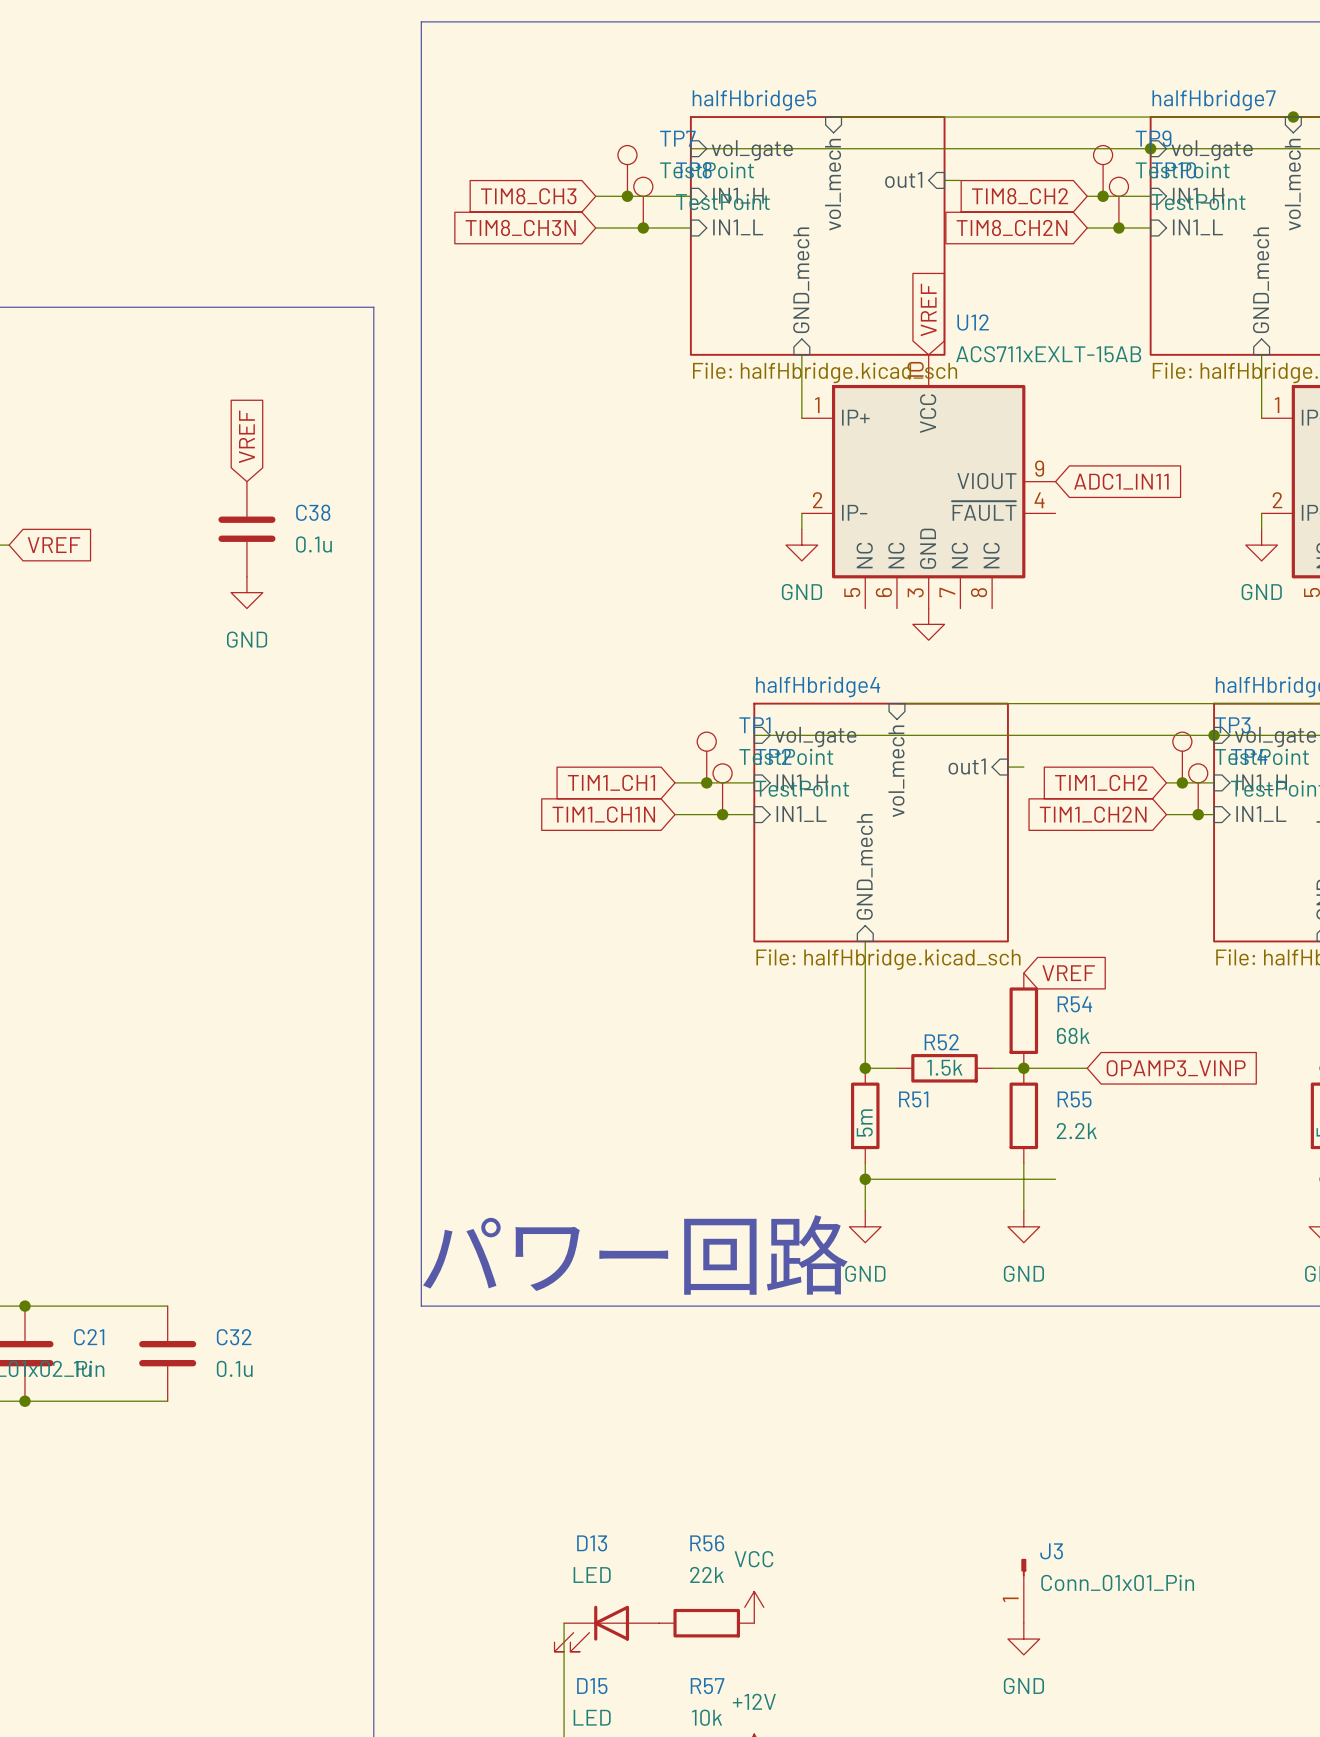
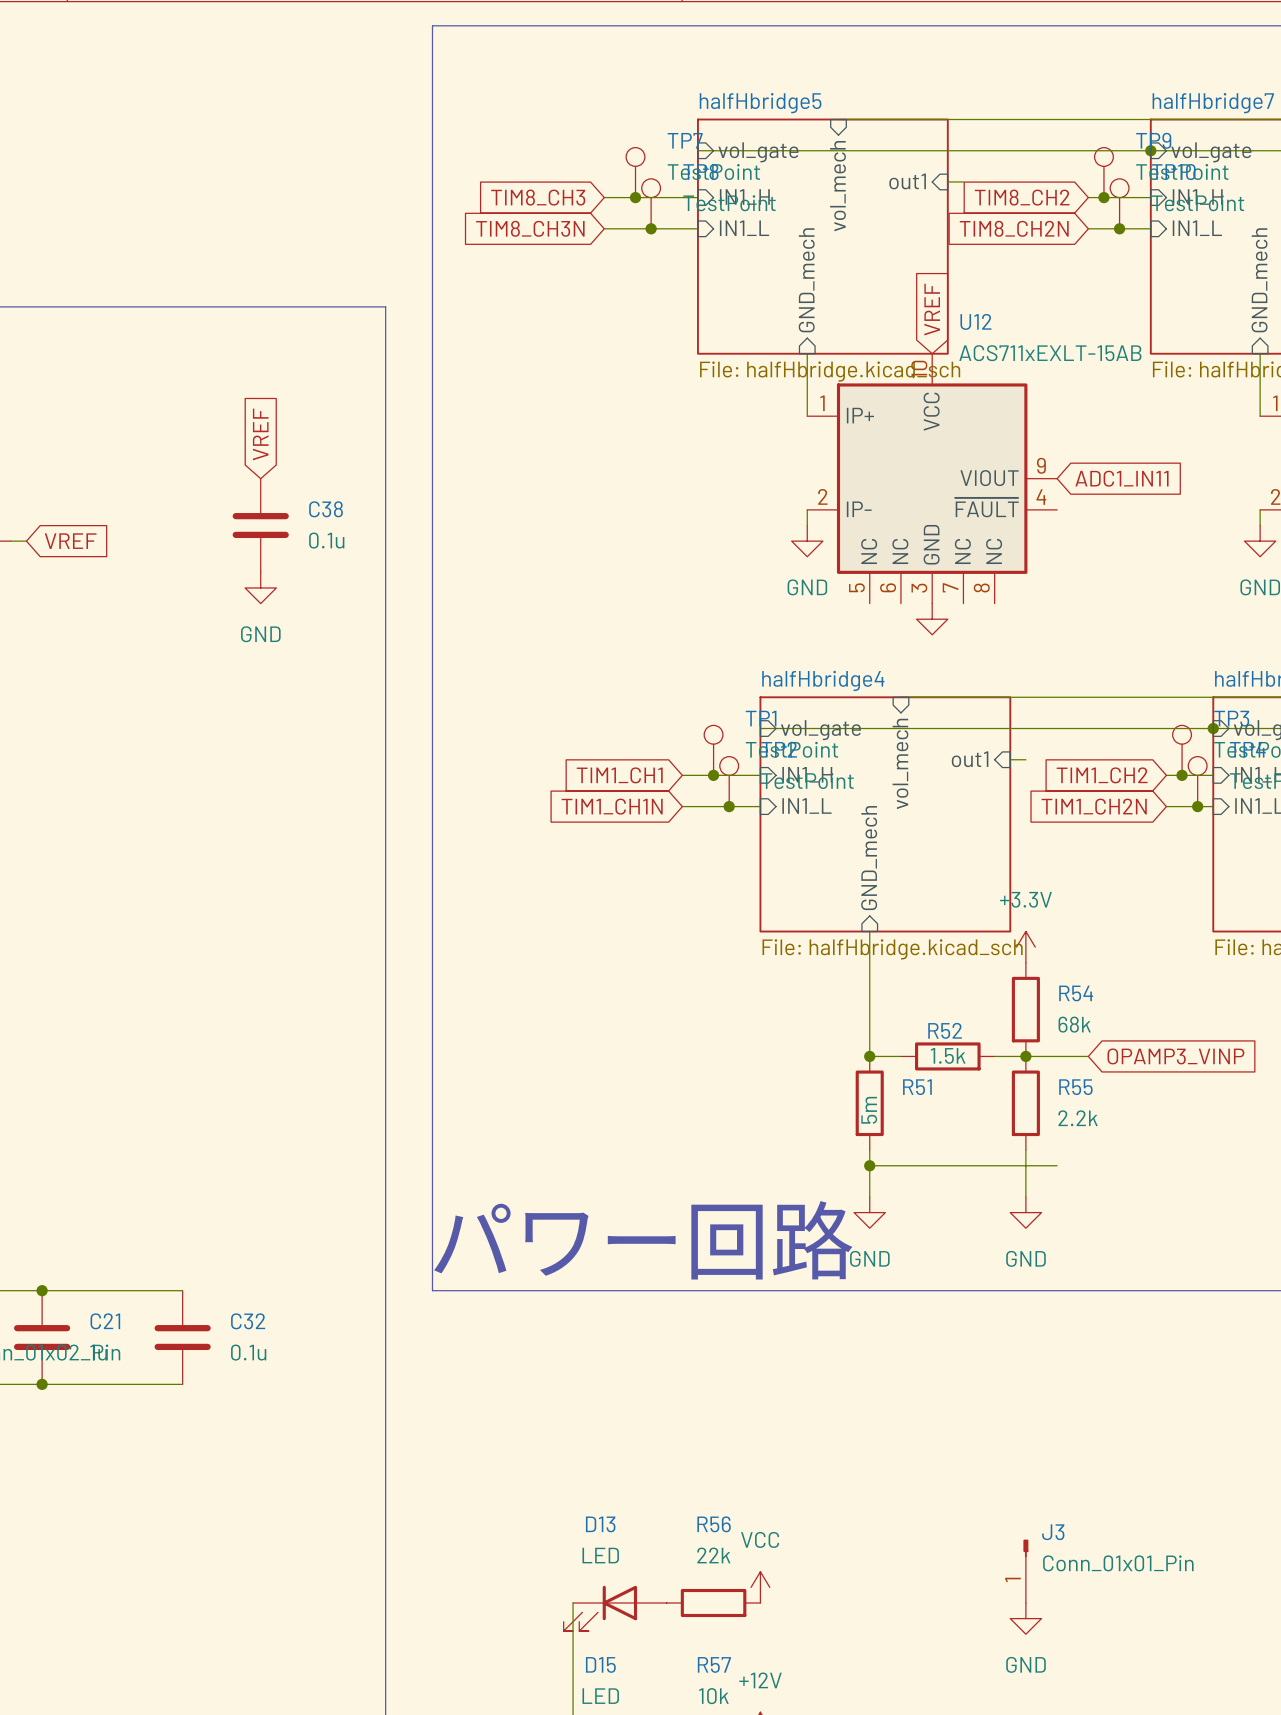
power symbol: none -> +3.3V (1025, 947)
global label: VREF (1068, 973) -> none

